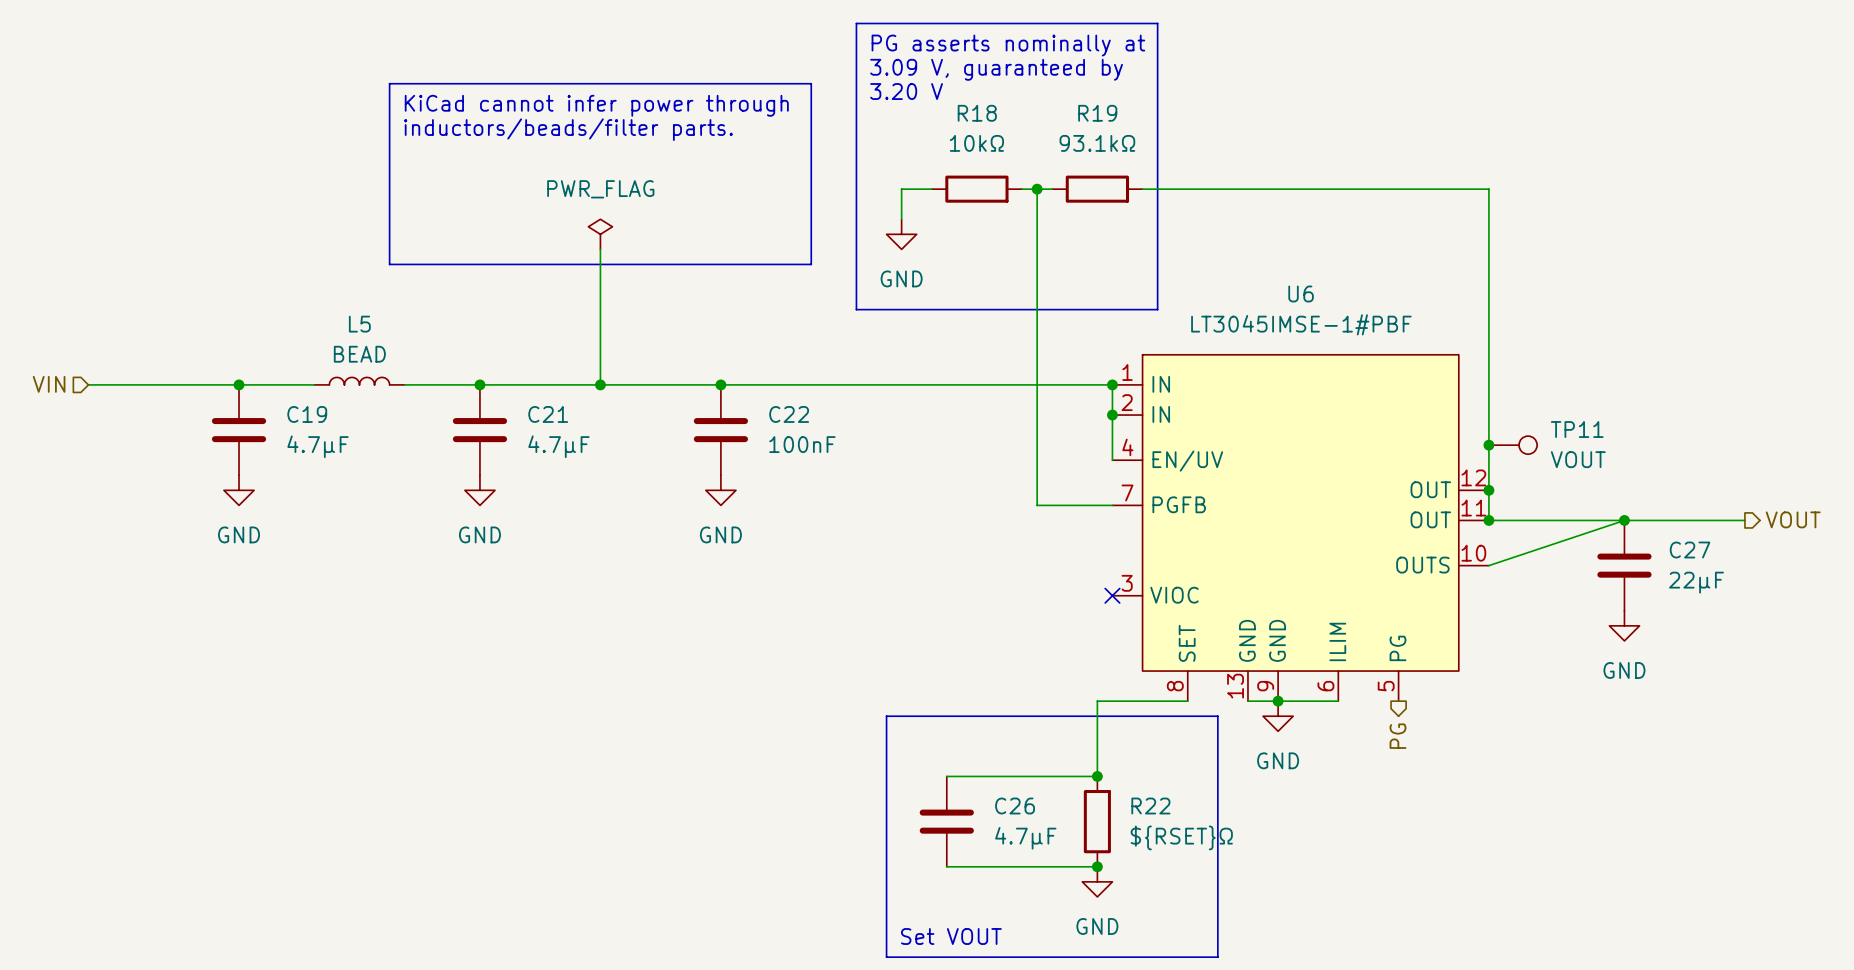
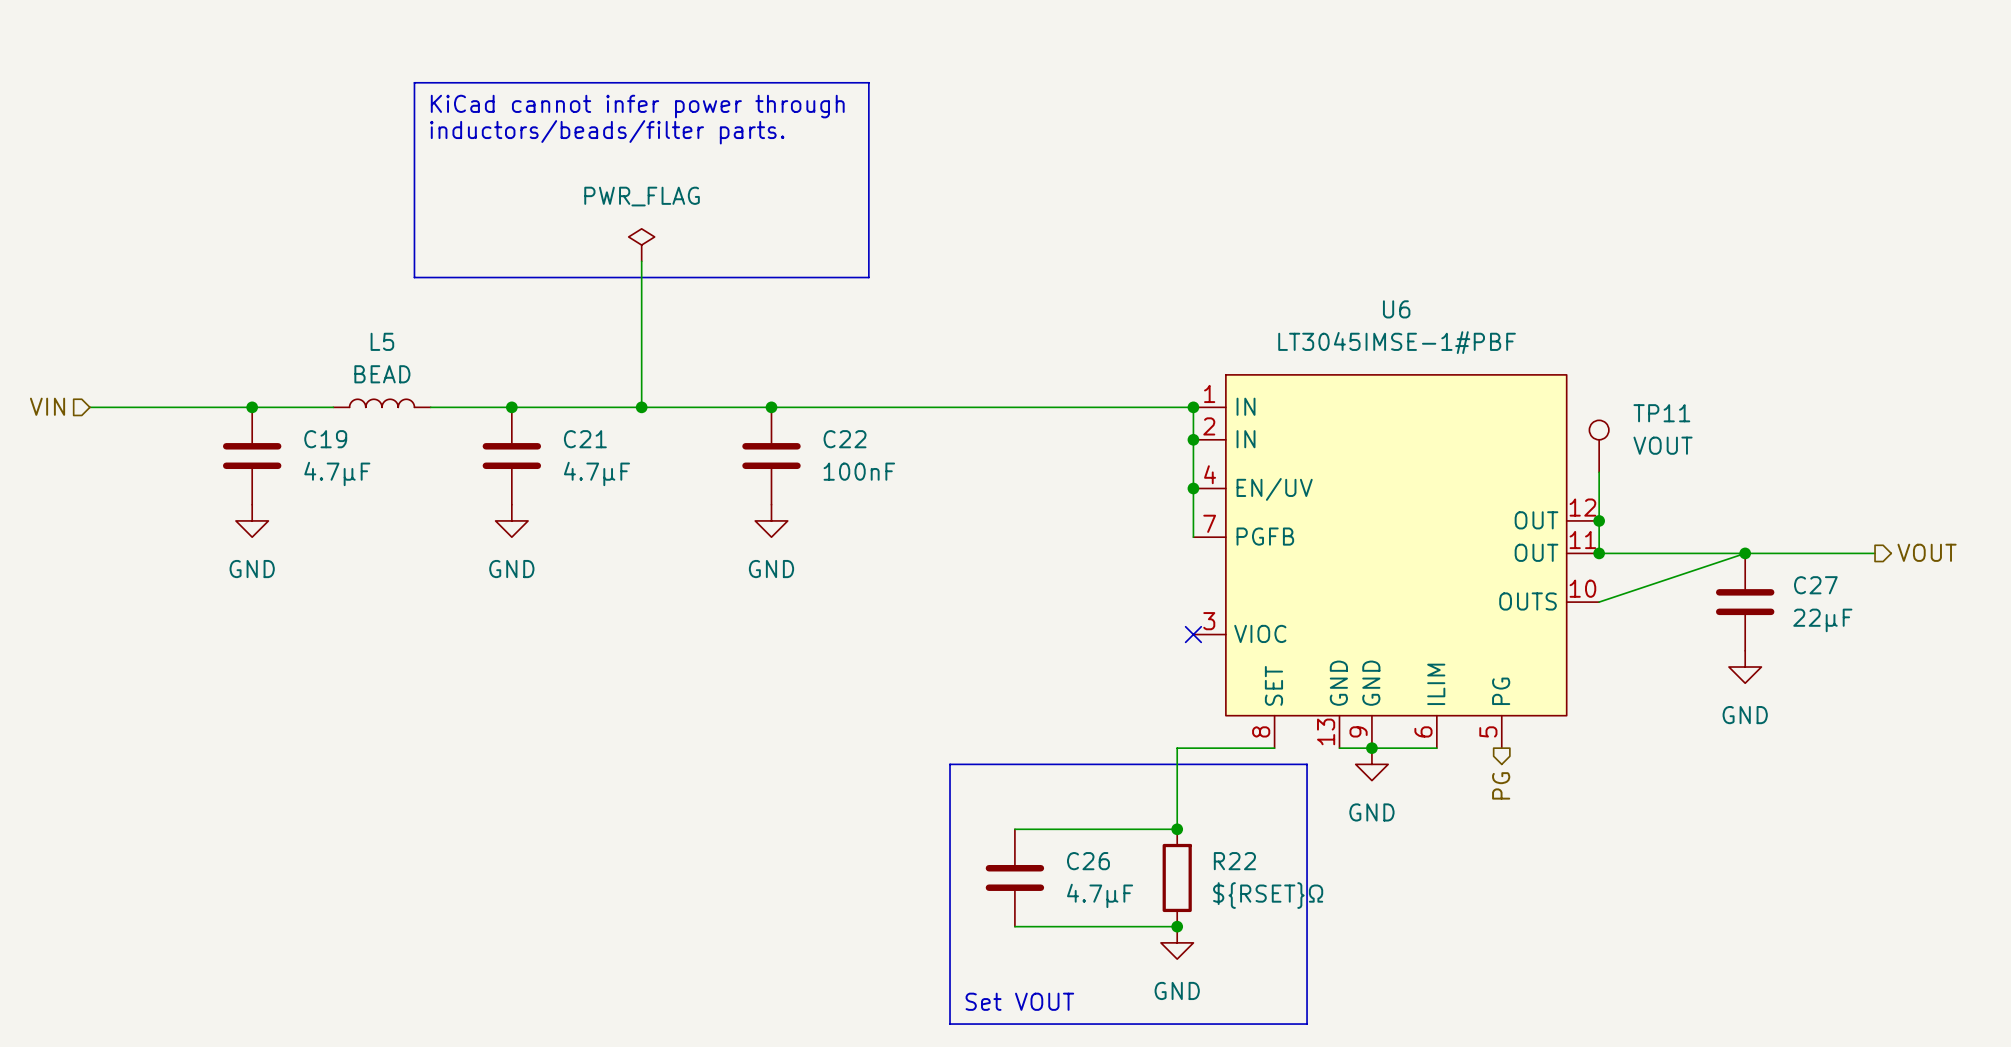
line: (856, 23) (1157, 23) (1157, 309) (856, 309) (856, 23) -> none
text: PG asserts nominally at (1008, 45) -> none
text: 3.09 V, guaranteed by (996, 69) -> none
text: 3.20 V (906, 91) -> none
wire: (931, 189) (901, 189) (901, 219) -> none
R18: 10kΩ (976, 189) -> none
wire: (1022, 189) (1052, 189) -> none
wire: (1037, 189) (1037, 505) (1112, 505) -> (1193, 488) (1193, 537)
junction: (1037, 189) -> none
R19: 93.1kΩ (1097, 189) -> none
wire: (1142, 189) (1488, 189) (1488, 445) -> none
power symbol: GND (901, 234) -> none
junction: (1488, 445) -> none
TP11 position: (1513, 445) -> (1599, 446)
TP11 rotation: 0° (1528, 445) -> 90° counterclockwise (1599, 430)
junction: none -> (1193, 488)

